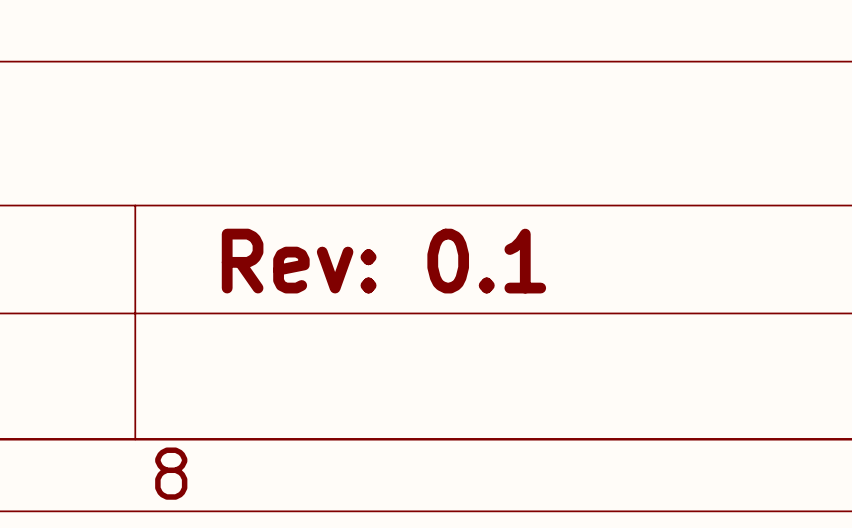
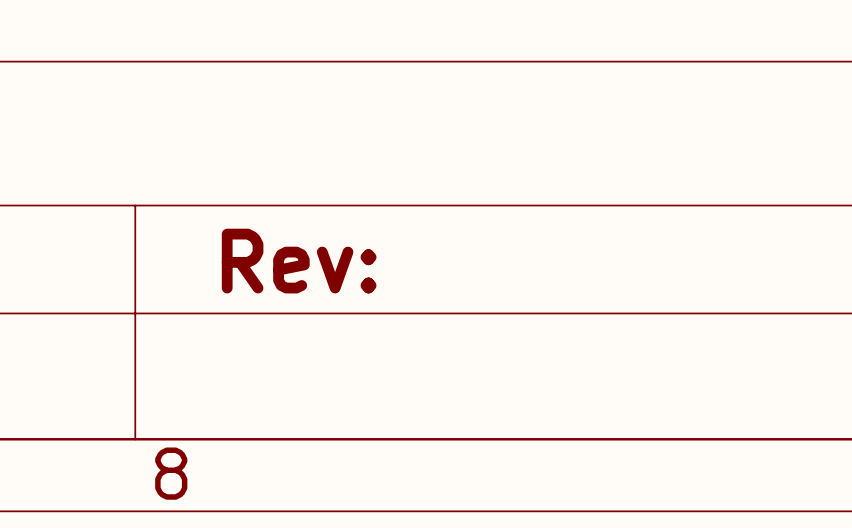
title block: Rev: 0.1 (383, 261) -> Rev: (299, 261)

